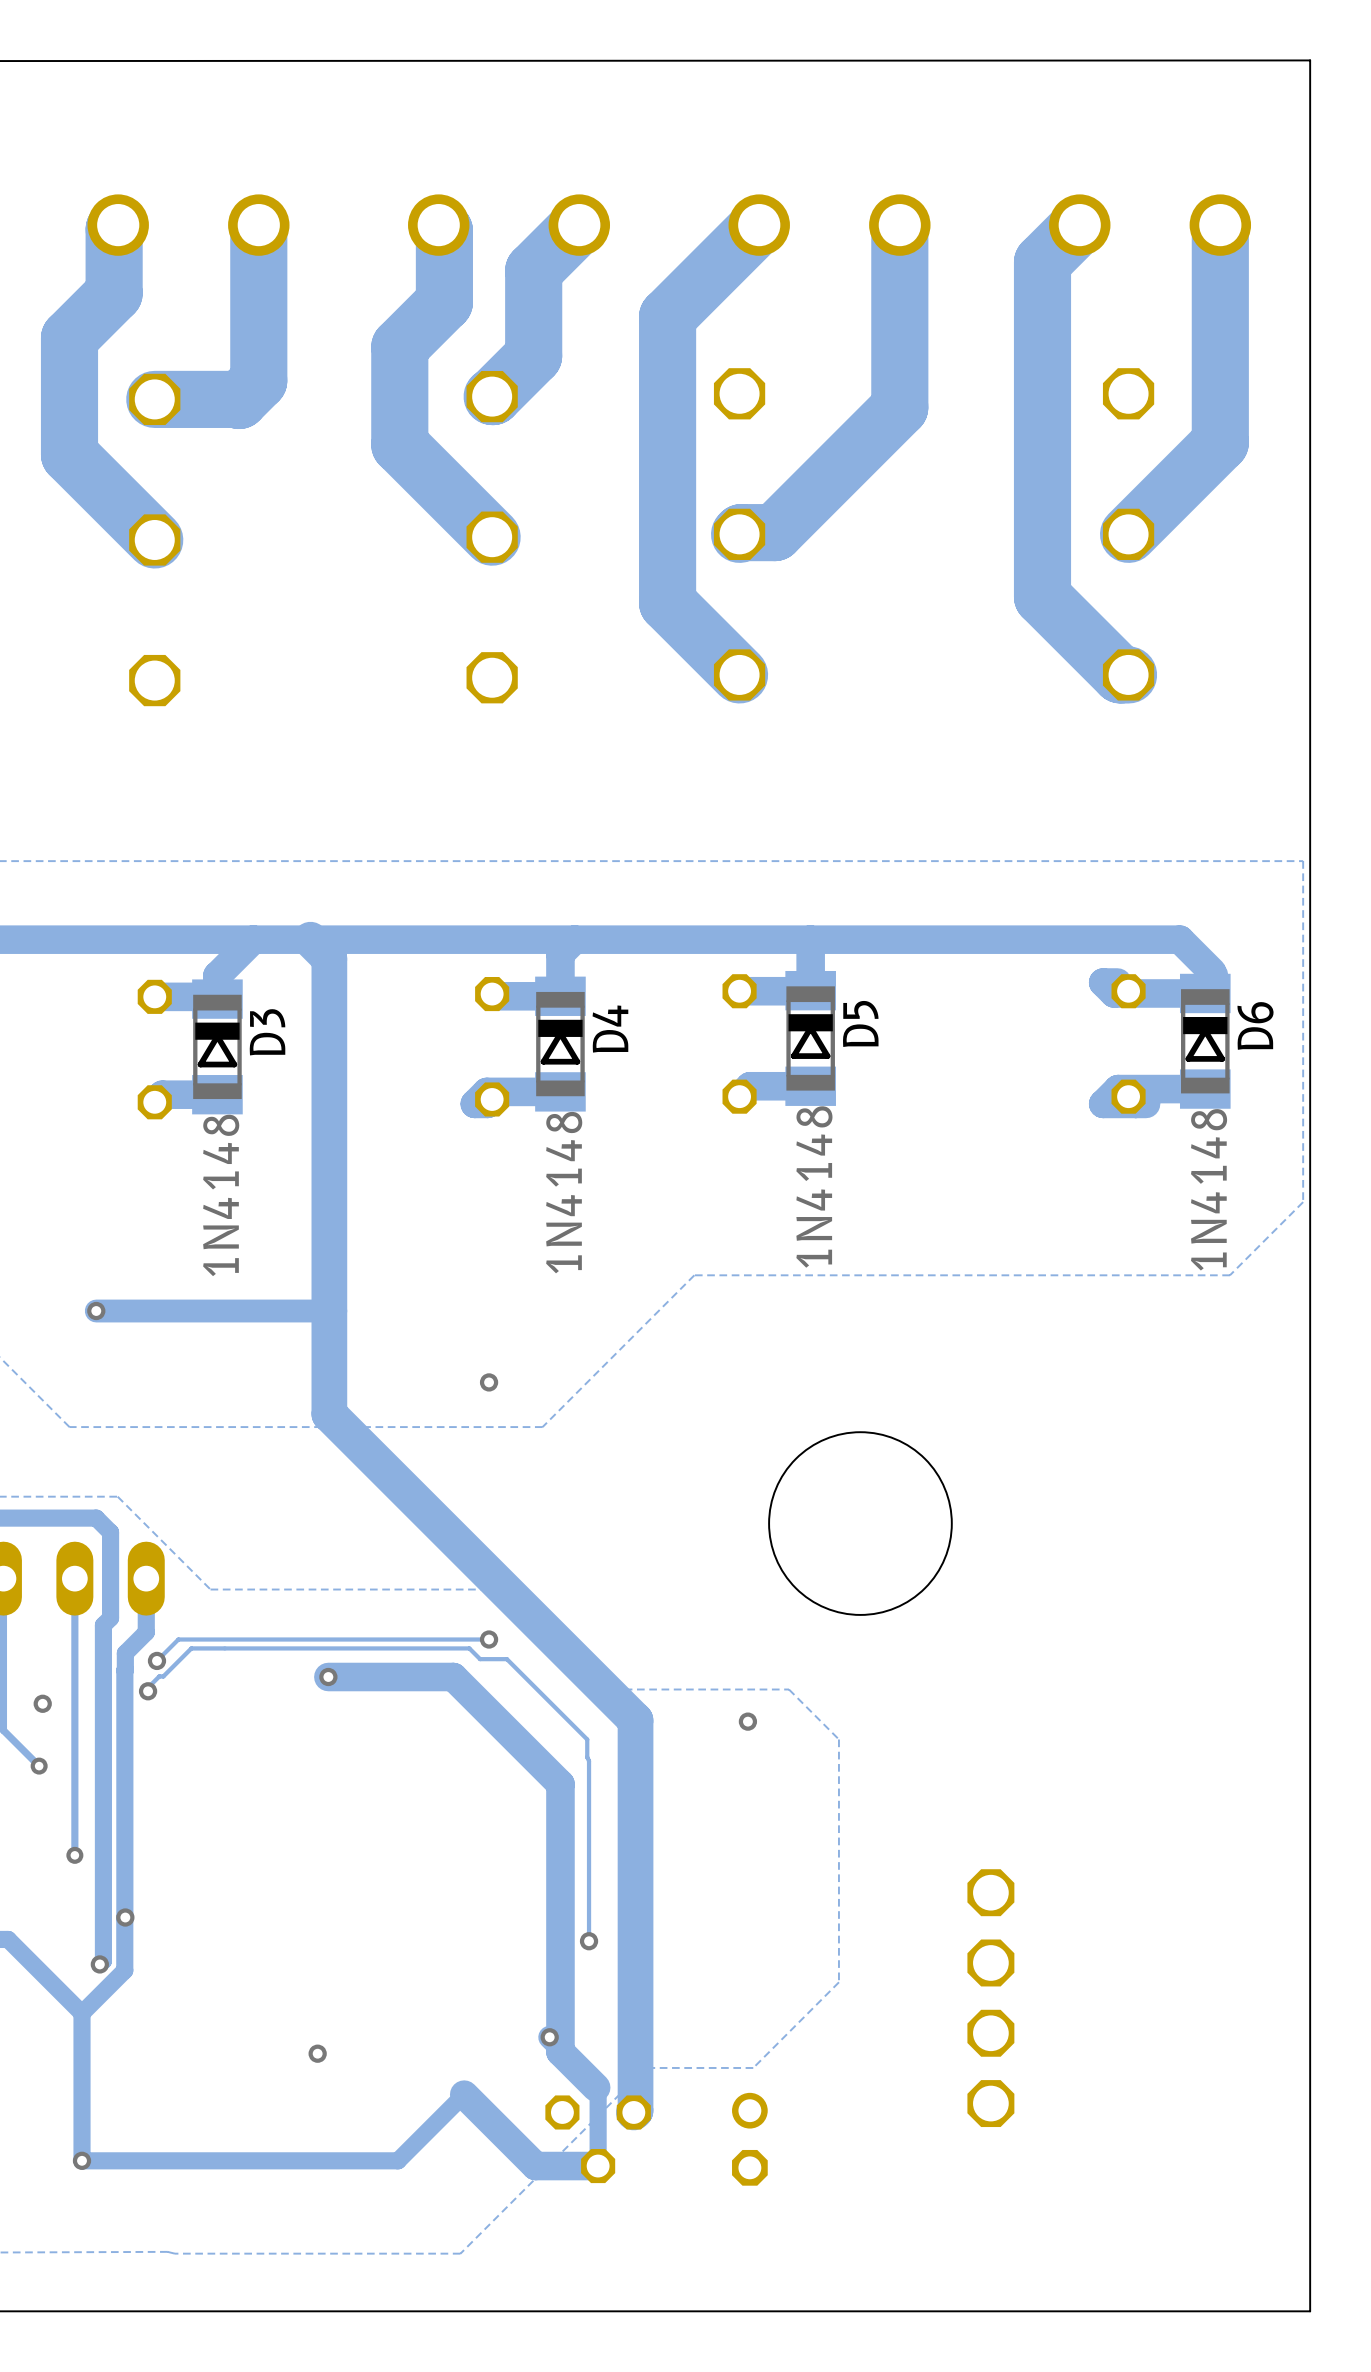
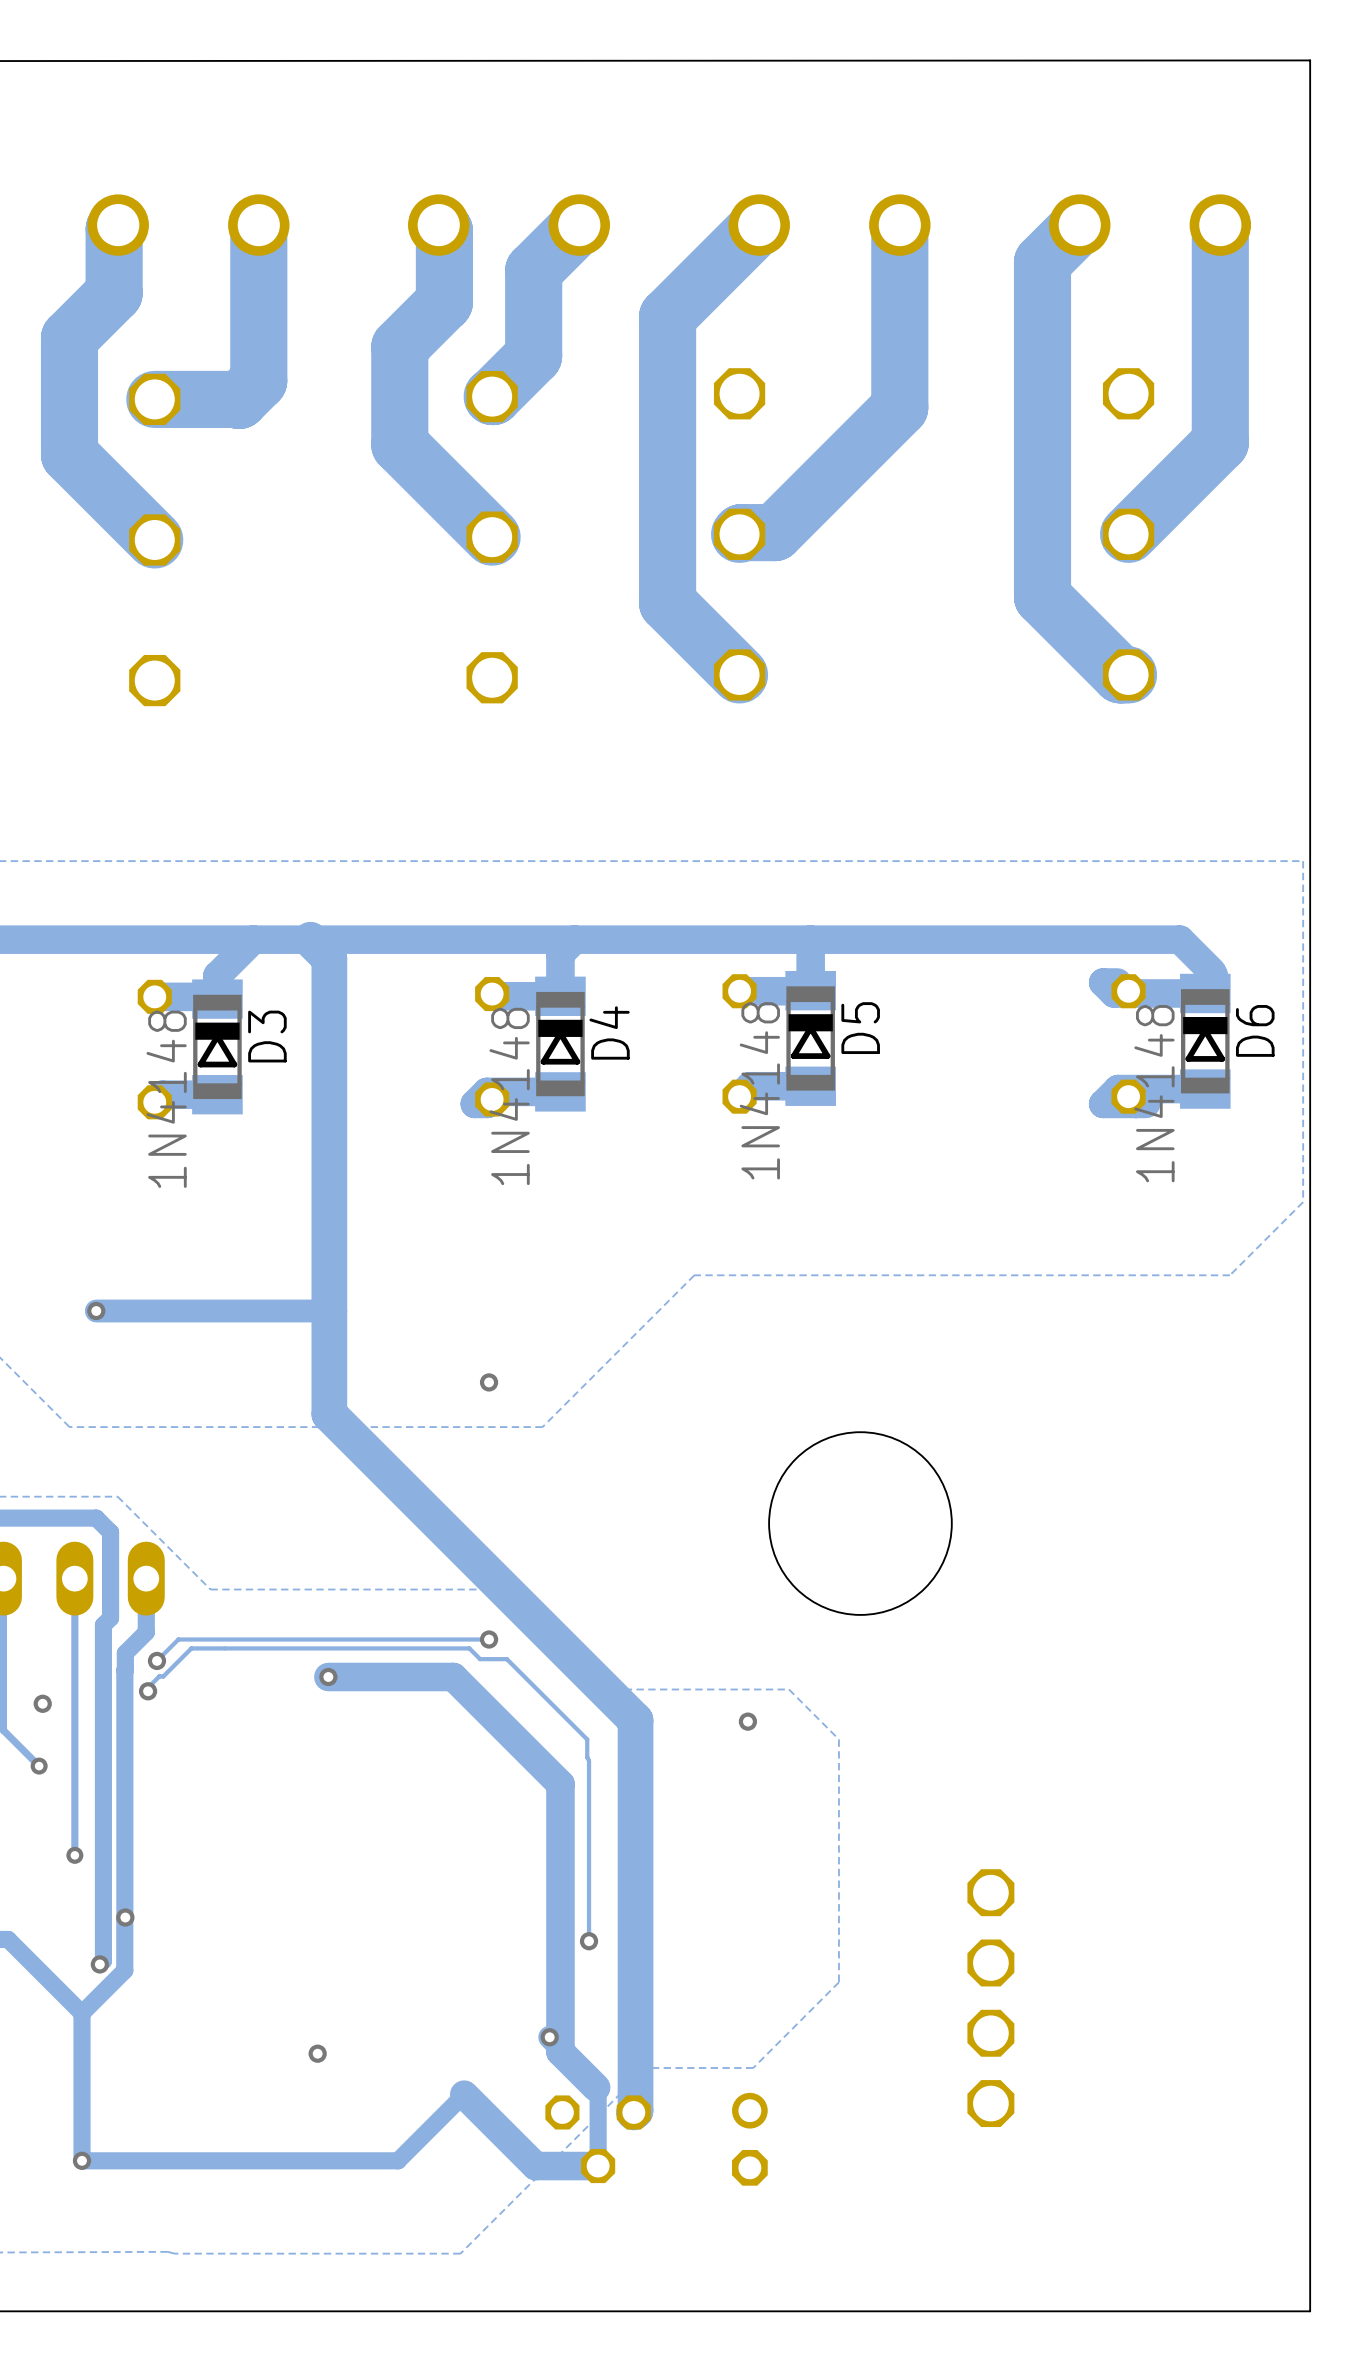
D5 value position: 1N4148 (814, 1187) -> 1N4148 (759, 1090)
D6 value position: 1N4148 (1209, 1189) -> 1N4148 (1154, 1093)
D4 value position: 1N4148 (564, 1192) -> 1N4148 (509, 1096)
D3 value position: 1N4148 (221, 1195) -> 1N4148 (166, 1099)

